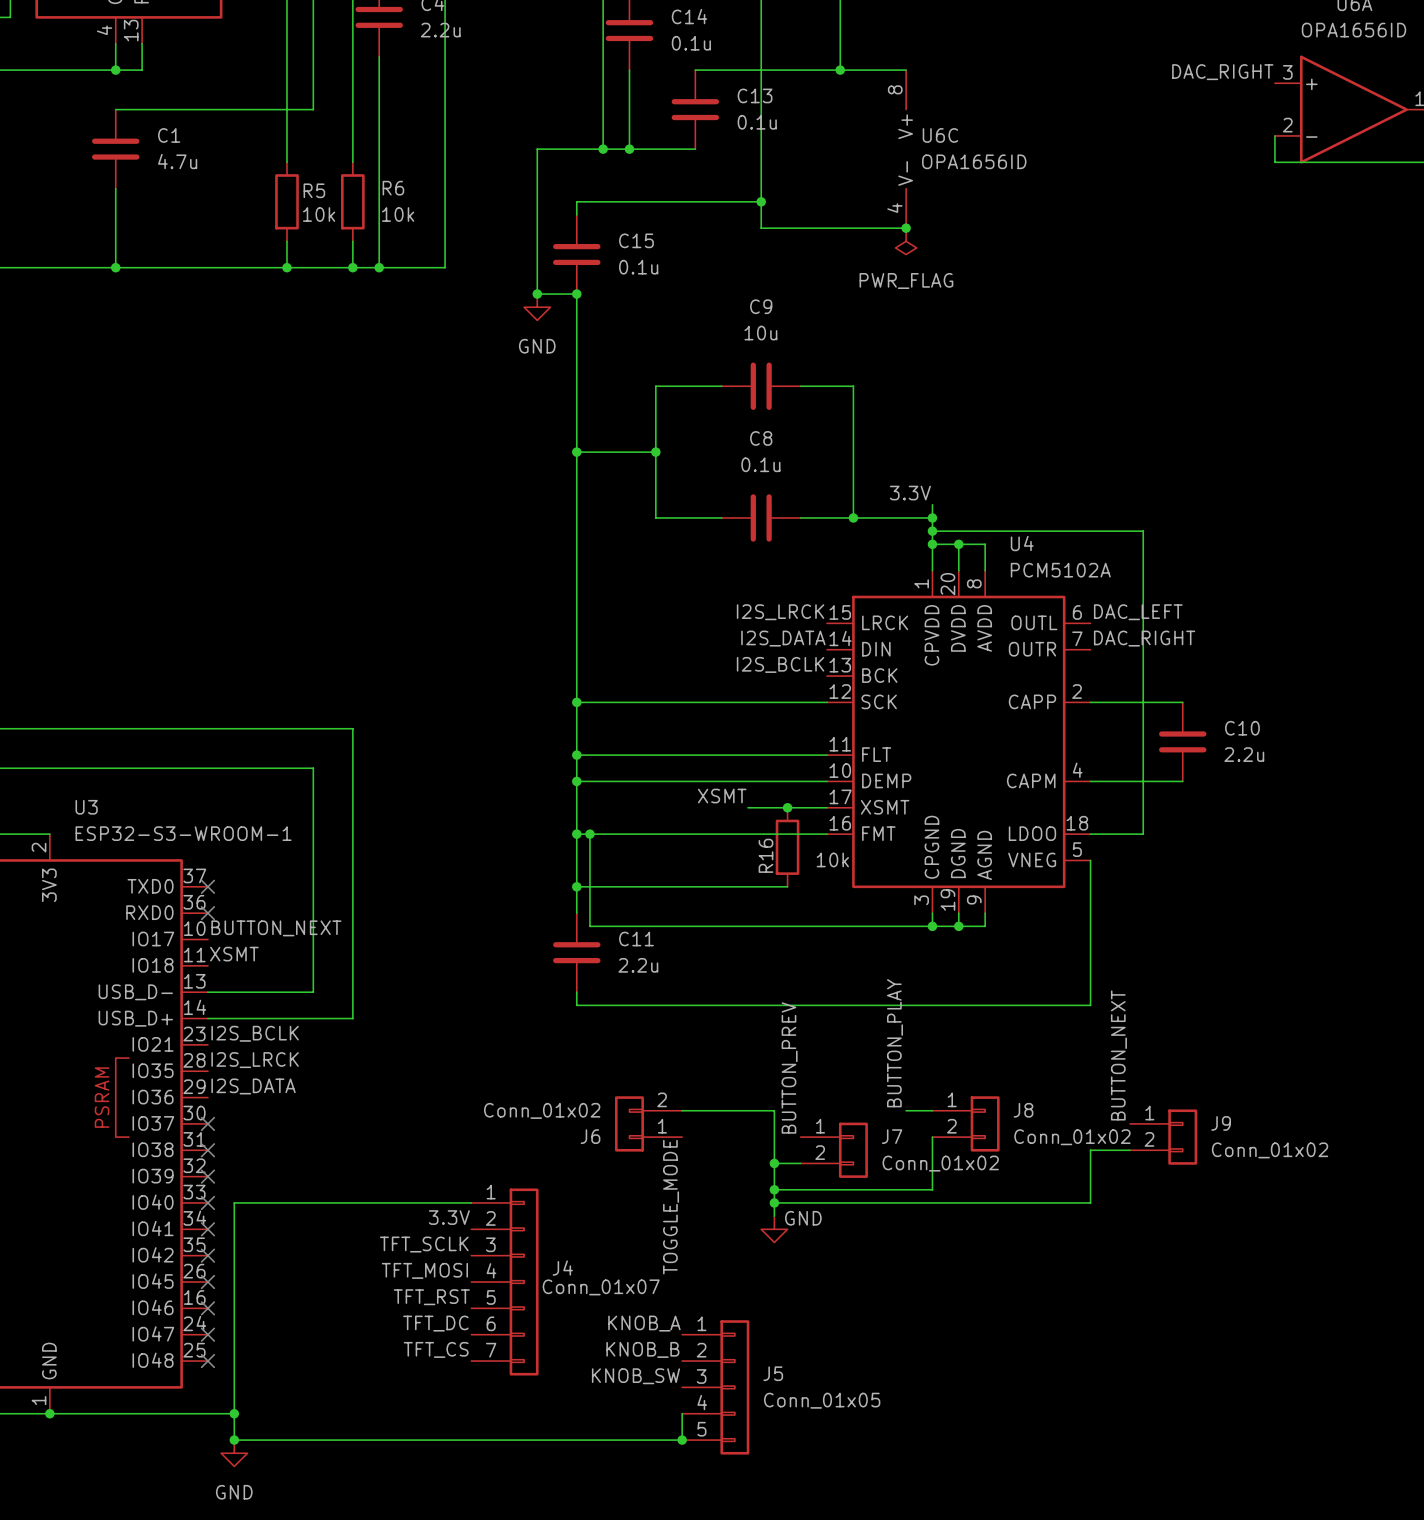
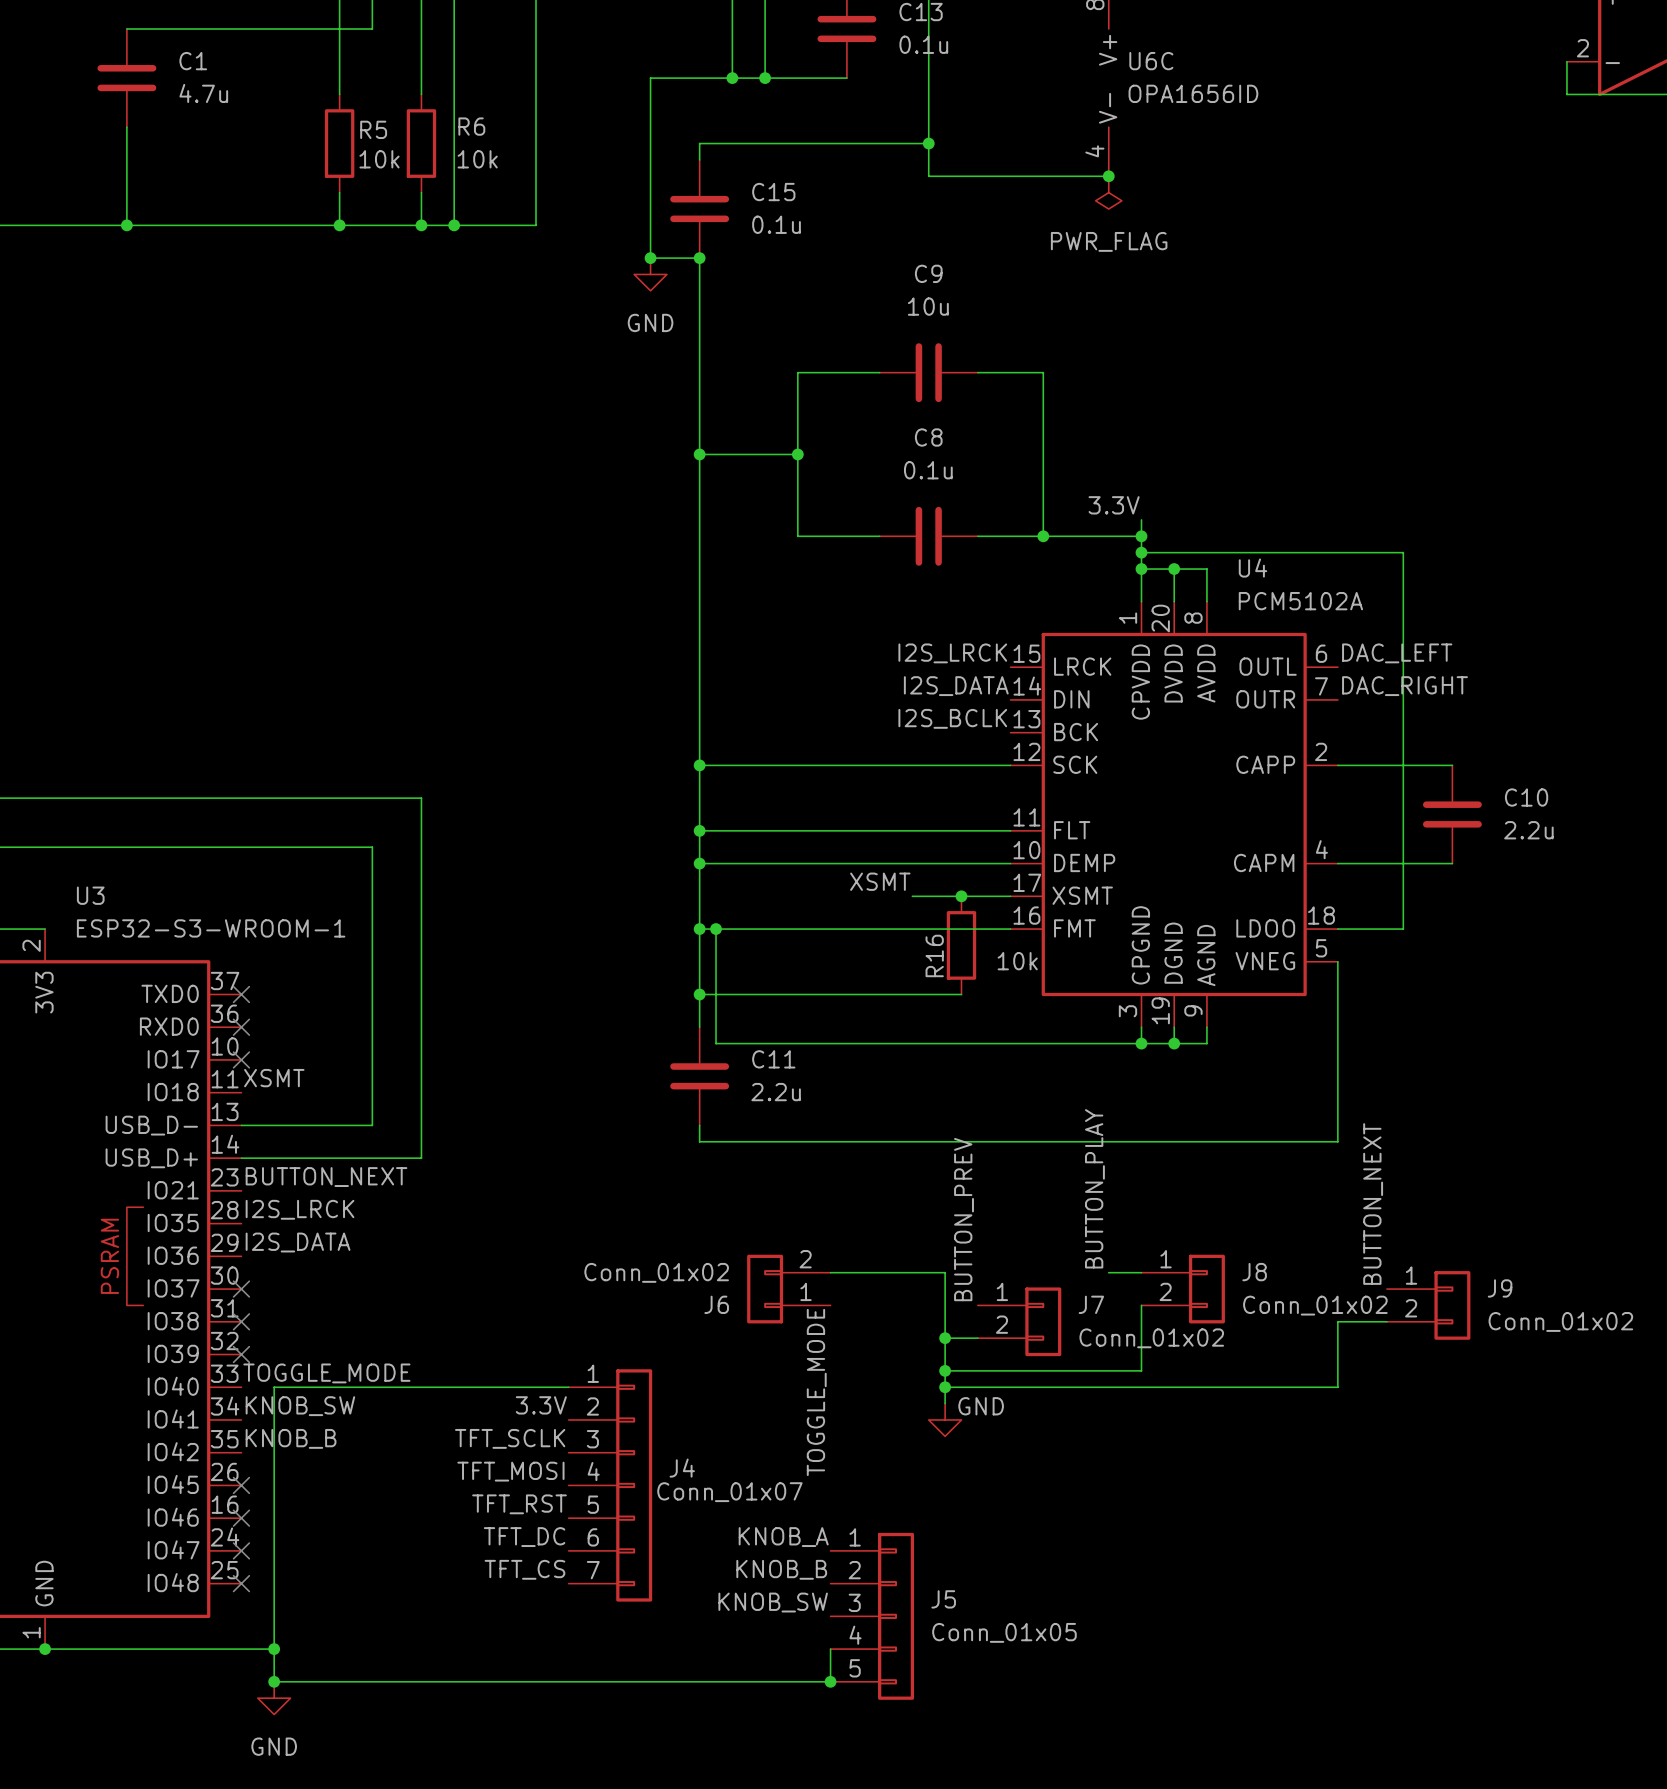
label: BUTTON_NEXT (276, 928) -> none
no-connect mark: none -> (241, 1059)
label: I2S_BCLK (255, 1033) -> BUTTON_NEXT (326, 1177)
label: none -> TOGGLE_MODE (326, 1373)
no-connect mark: (207, 1202) -> none
label: none -> KNOB_SW (300, 1406)
no-connect mark: (207, 1229) -> none
label: none -> KNOB_B (291, 1438)
no-connect mark: (207, 1255) -> none

